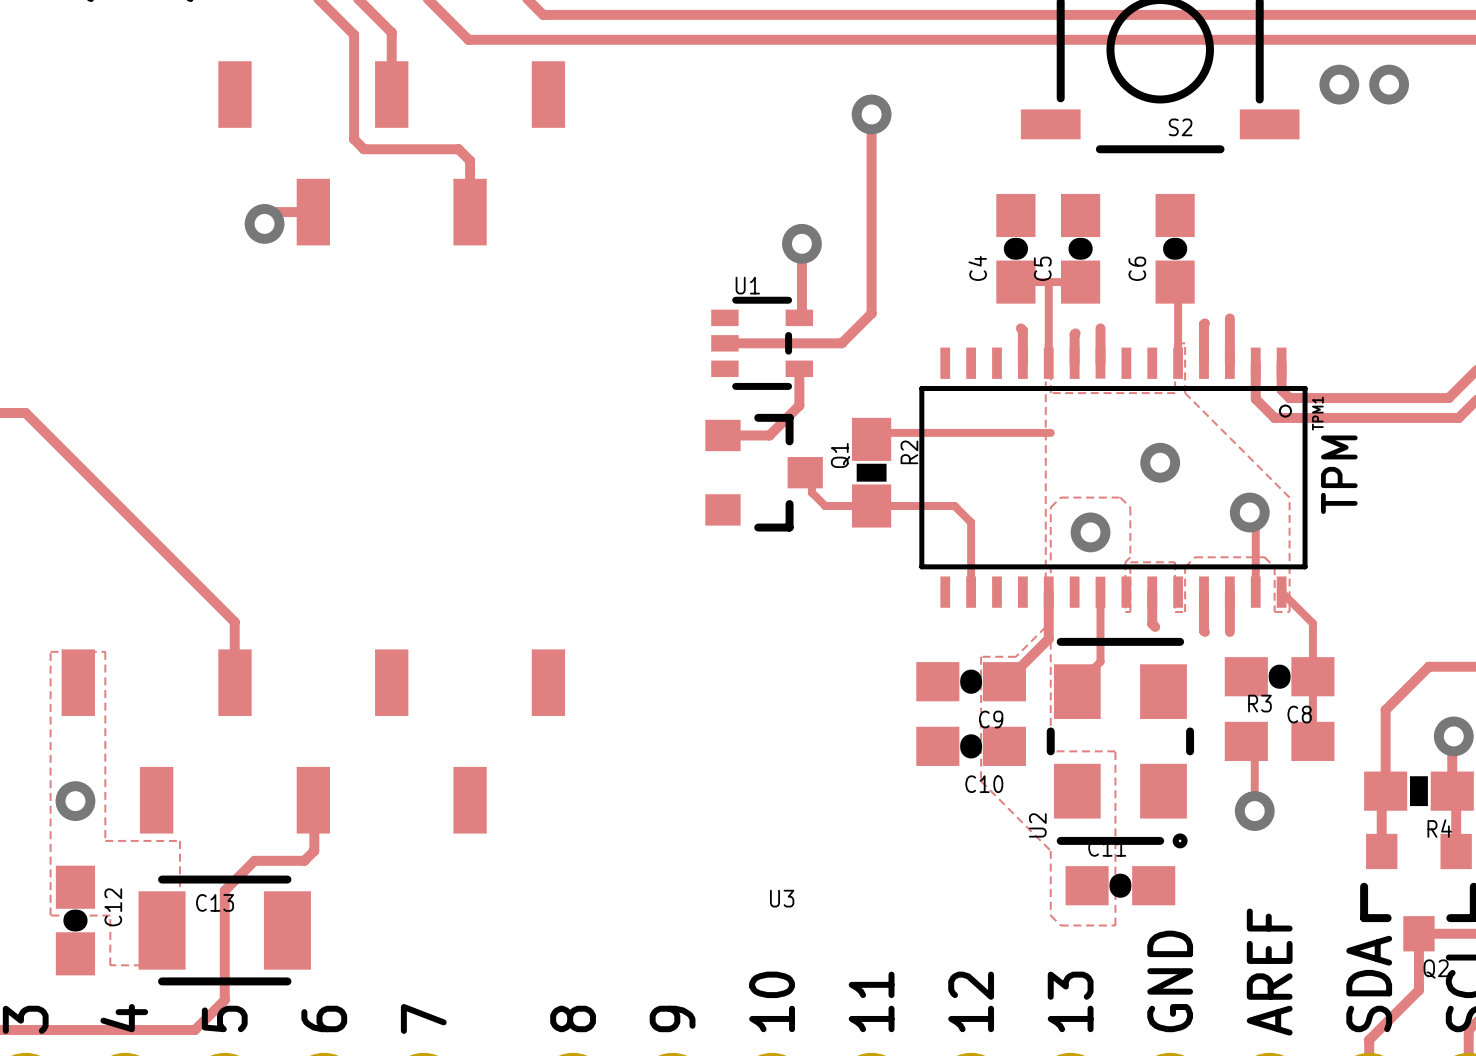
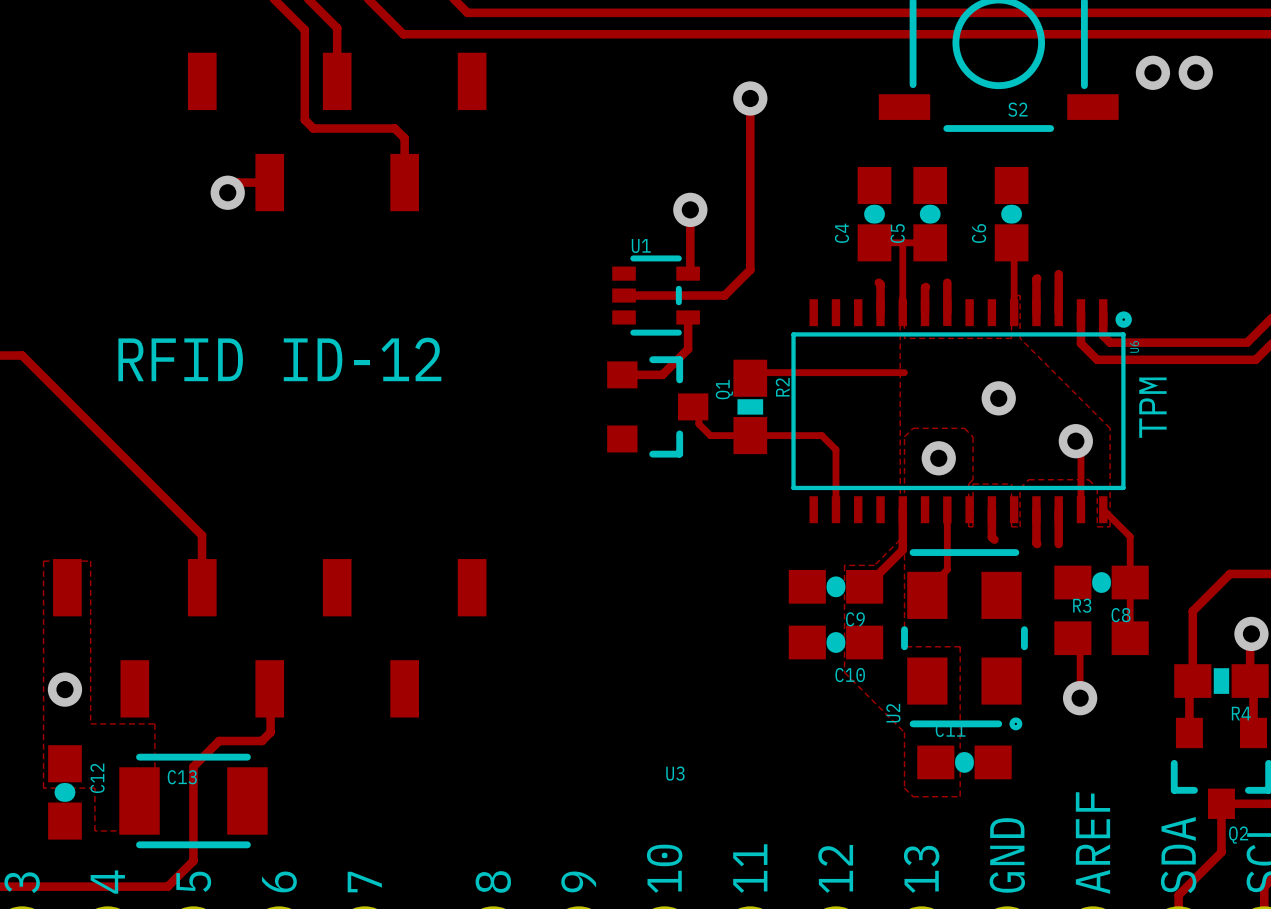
text: none -> RFID ID-12 (279, 359)
TPM1: (1113, 477) -> none
U6: none -> (961, 411)

